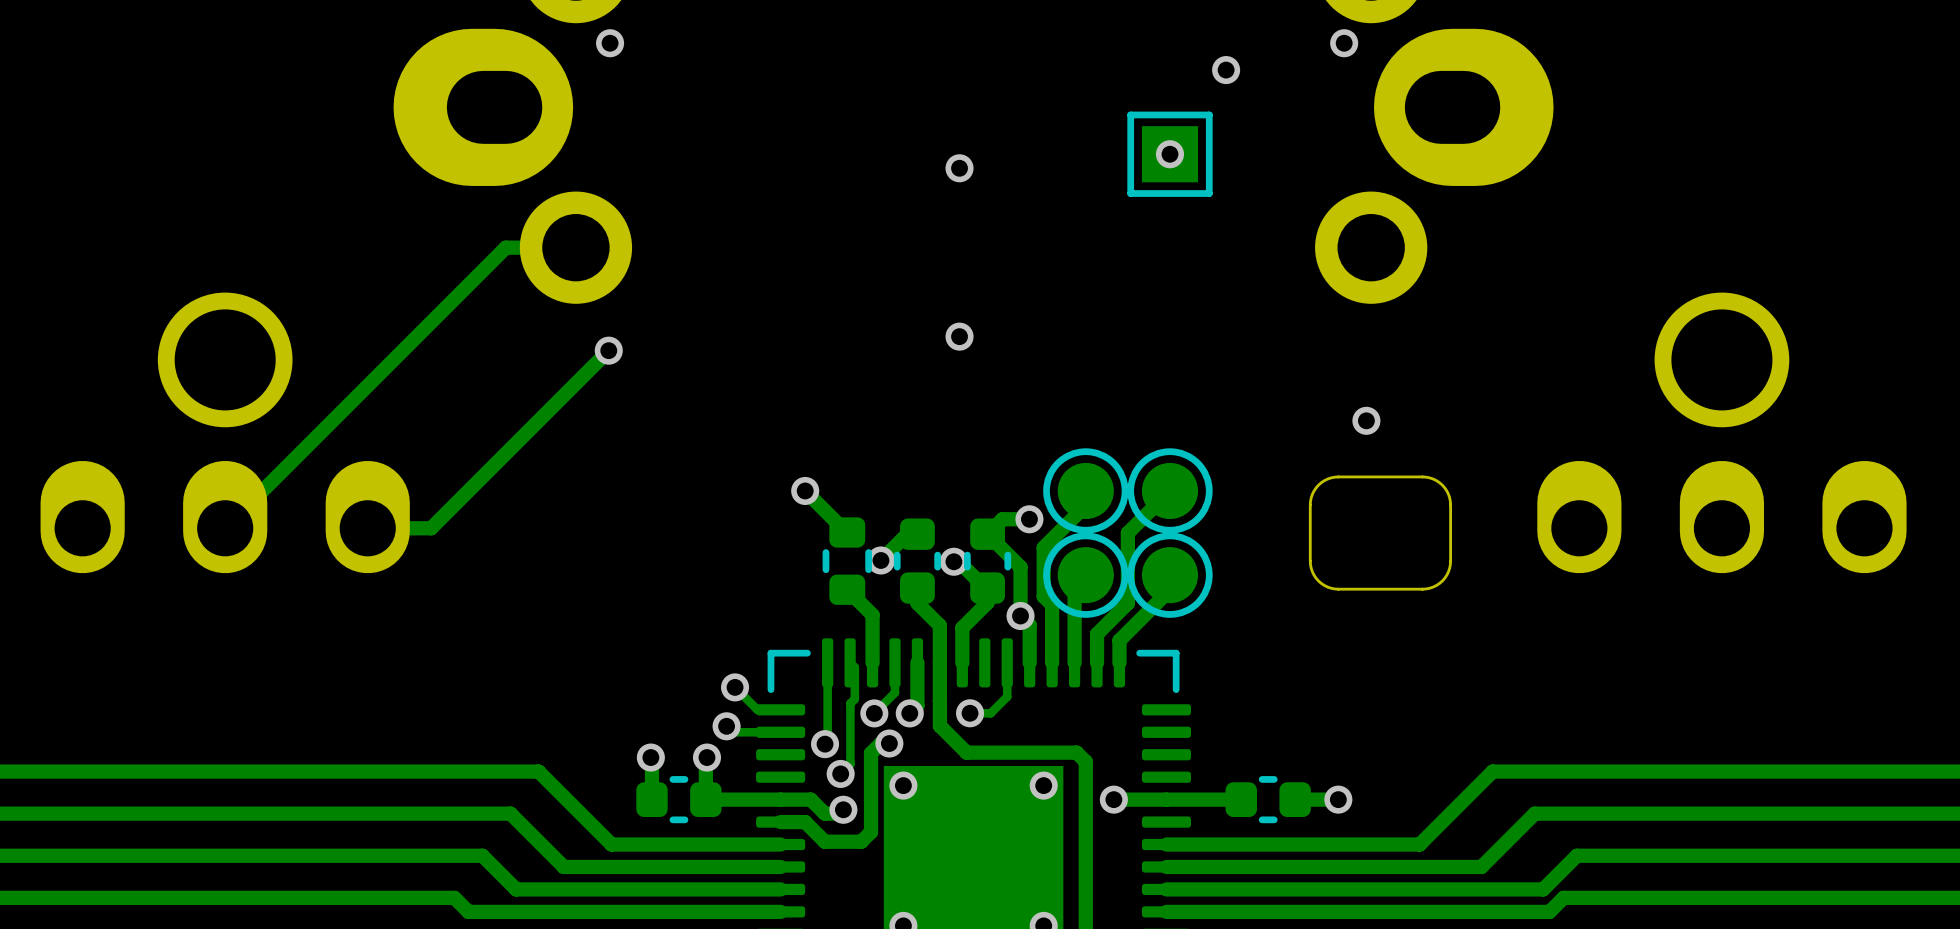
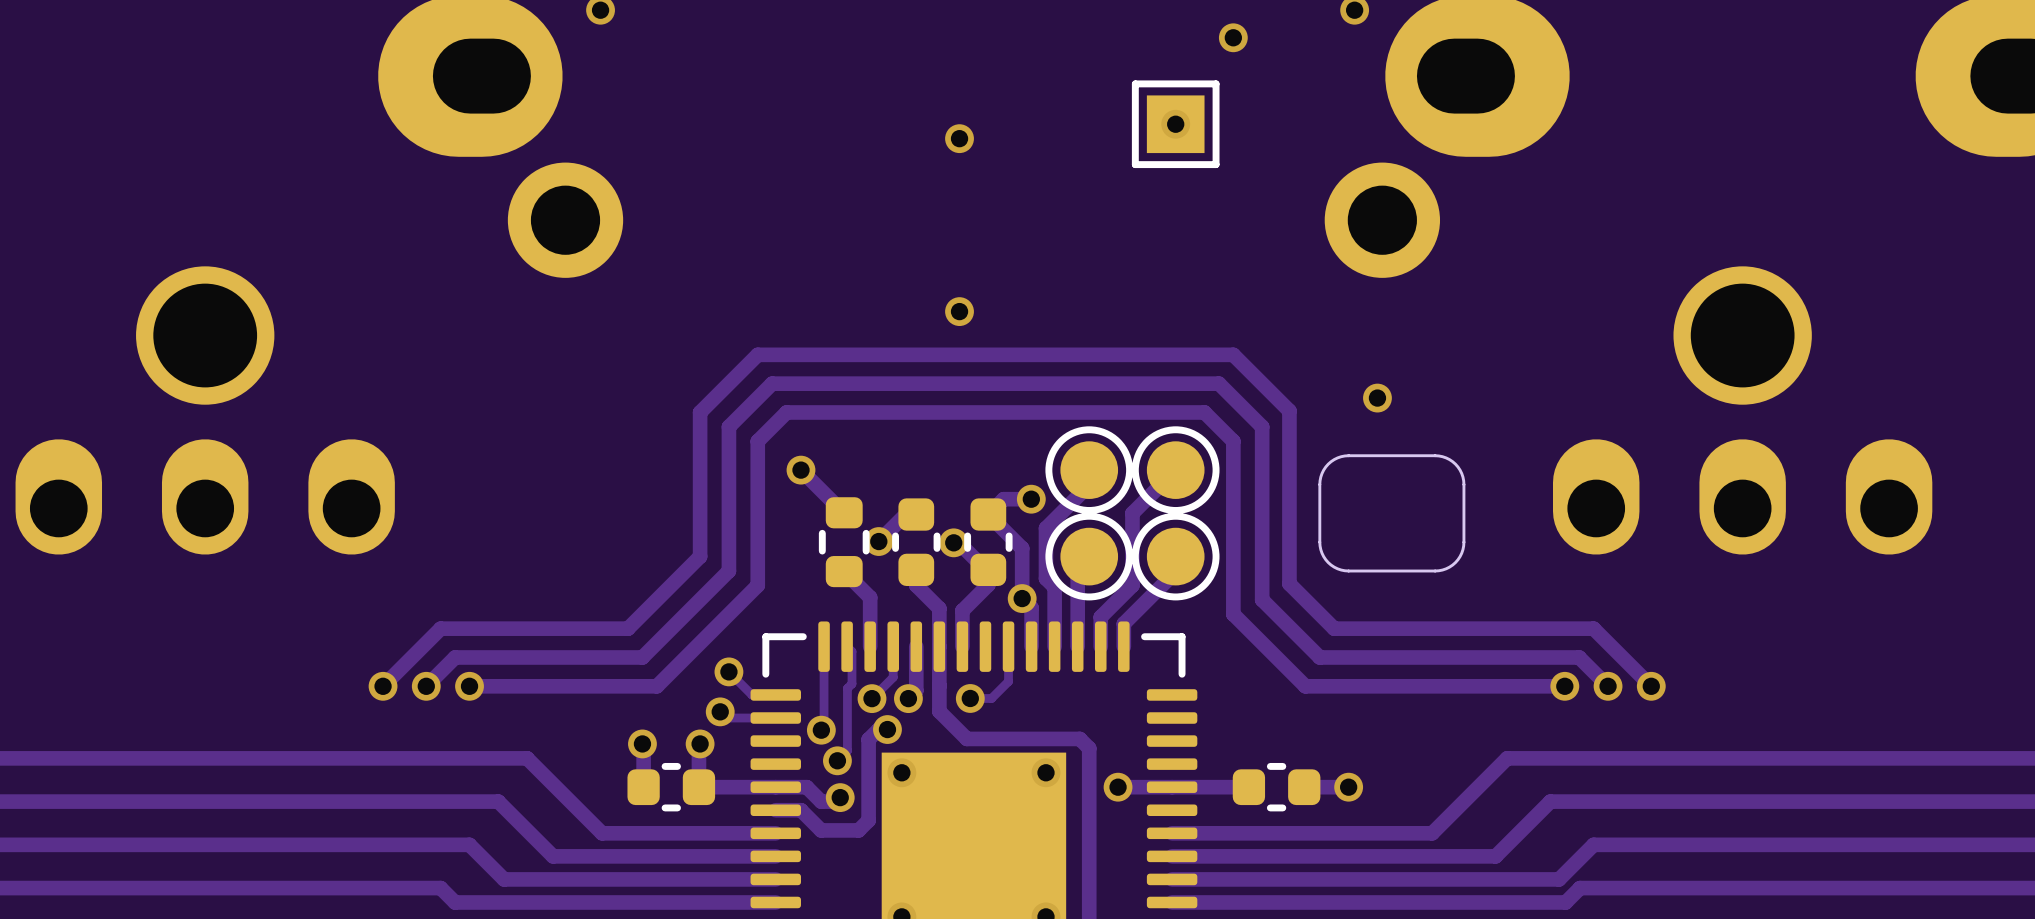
track: (575, 247) (505, 247) (225, 528) -> none
track: (608, 350) (431, 528) (367, 528) -> none
via: (608, 350) -> none
via: none -> (383, 686)
via: none -> (426, 686)
via: none -> (469, 686)
track: none -> (1564, 686) (1305, 686) (1233, 614) (1233, 441) (1204, 412) (786, 412) (757, 441) (757, 585) (656, 686) (469, 686)
via: none -> (1564, 686)
track: none -> (1608, 686) (1579, 657) (1319, 657) (1262, 599) (1262, 426) (1218, 383) (772, 383) (728, 426) (728, 571) (642, 657) (455, 657) (426, 686)
via: none -> (1608, 686)
track: none -> (1651, 686) (1593, 628) (1334, 628) (1289, 583) (1289, 410) (1233, 354) (757, 354) (700, 412) (700, 556) (628, 628) (440, 628) (383, 686)
via: none -> (1651, 686)

